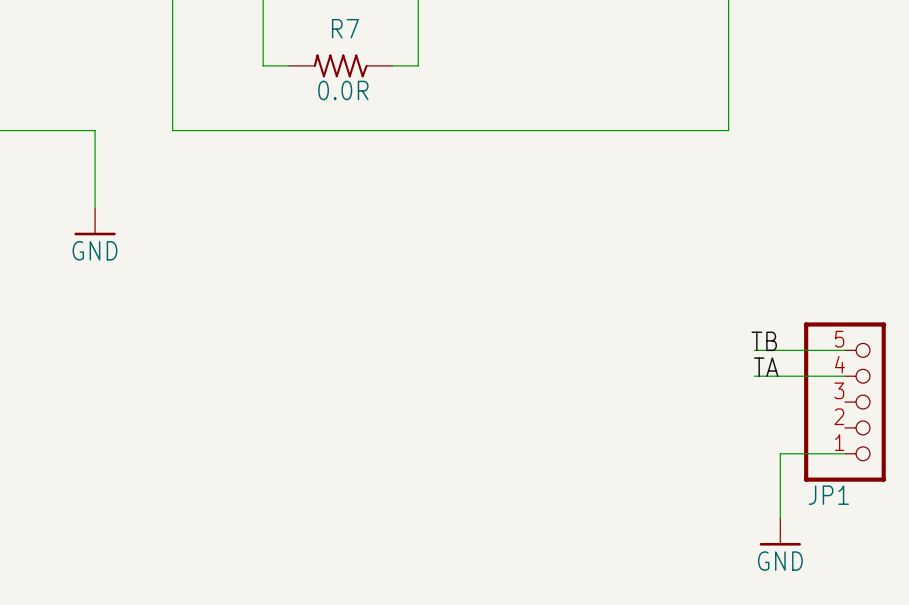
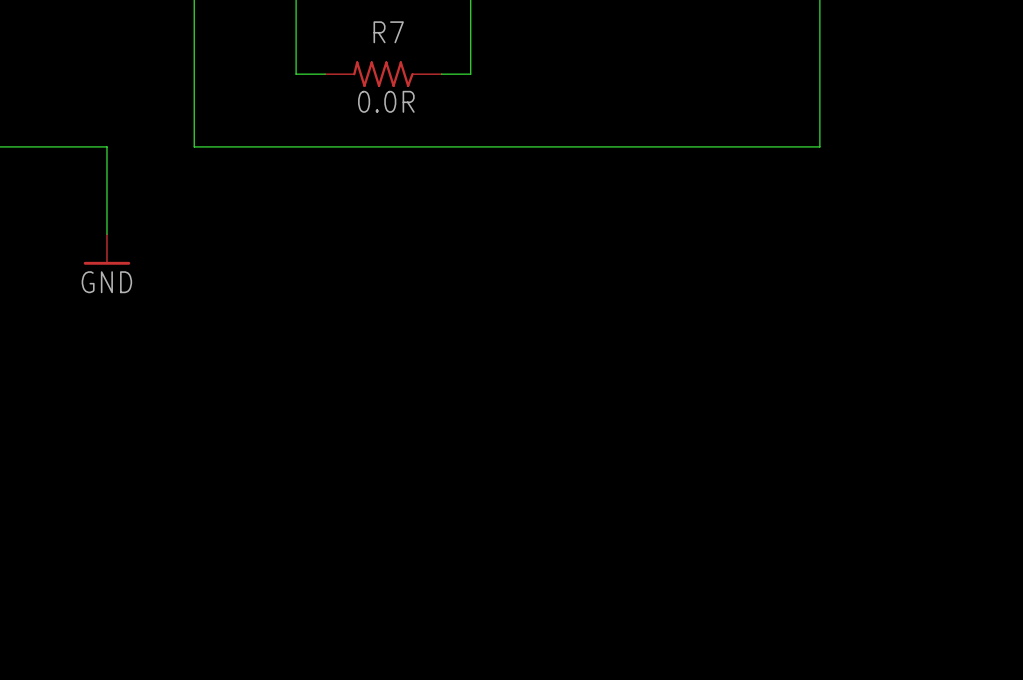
label: TB (764, 341) -> none
wire: (754, 350) (844, 350) -> none
label: TA (766, 367) -> none
wire: (754, 376) (844, 376) -> none
JP1: (844, 402) -> none
wire: (844, 453) (780, 453) (780, 518) -> none
power symbol: GND (780, 532) -> none

